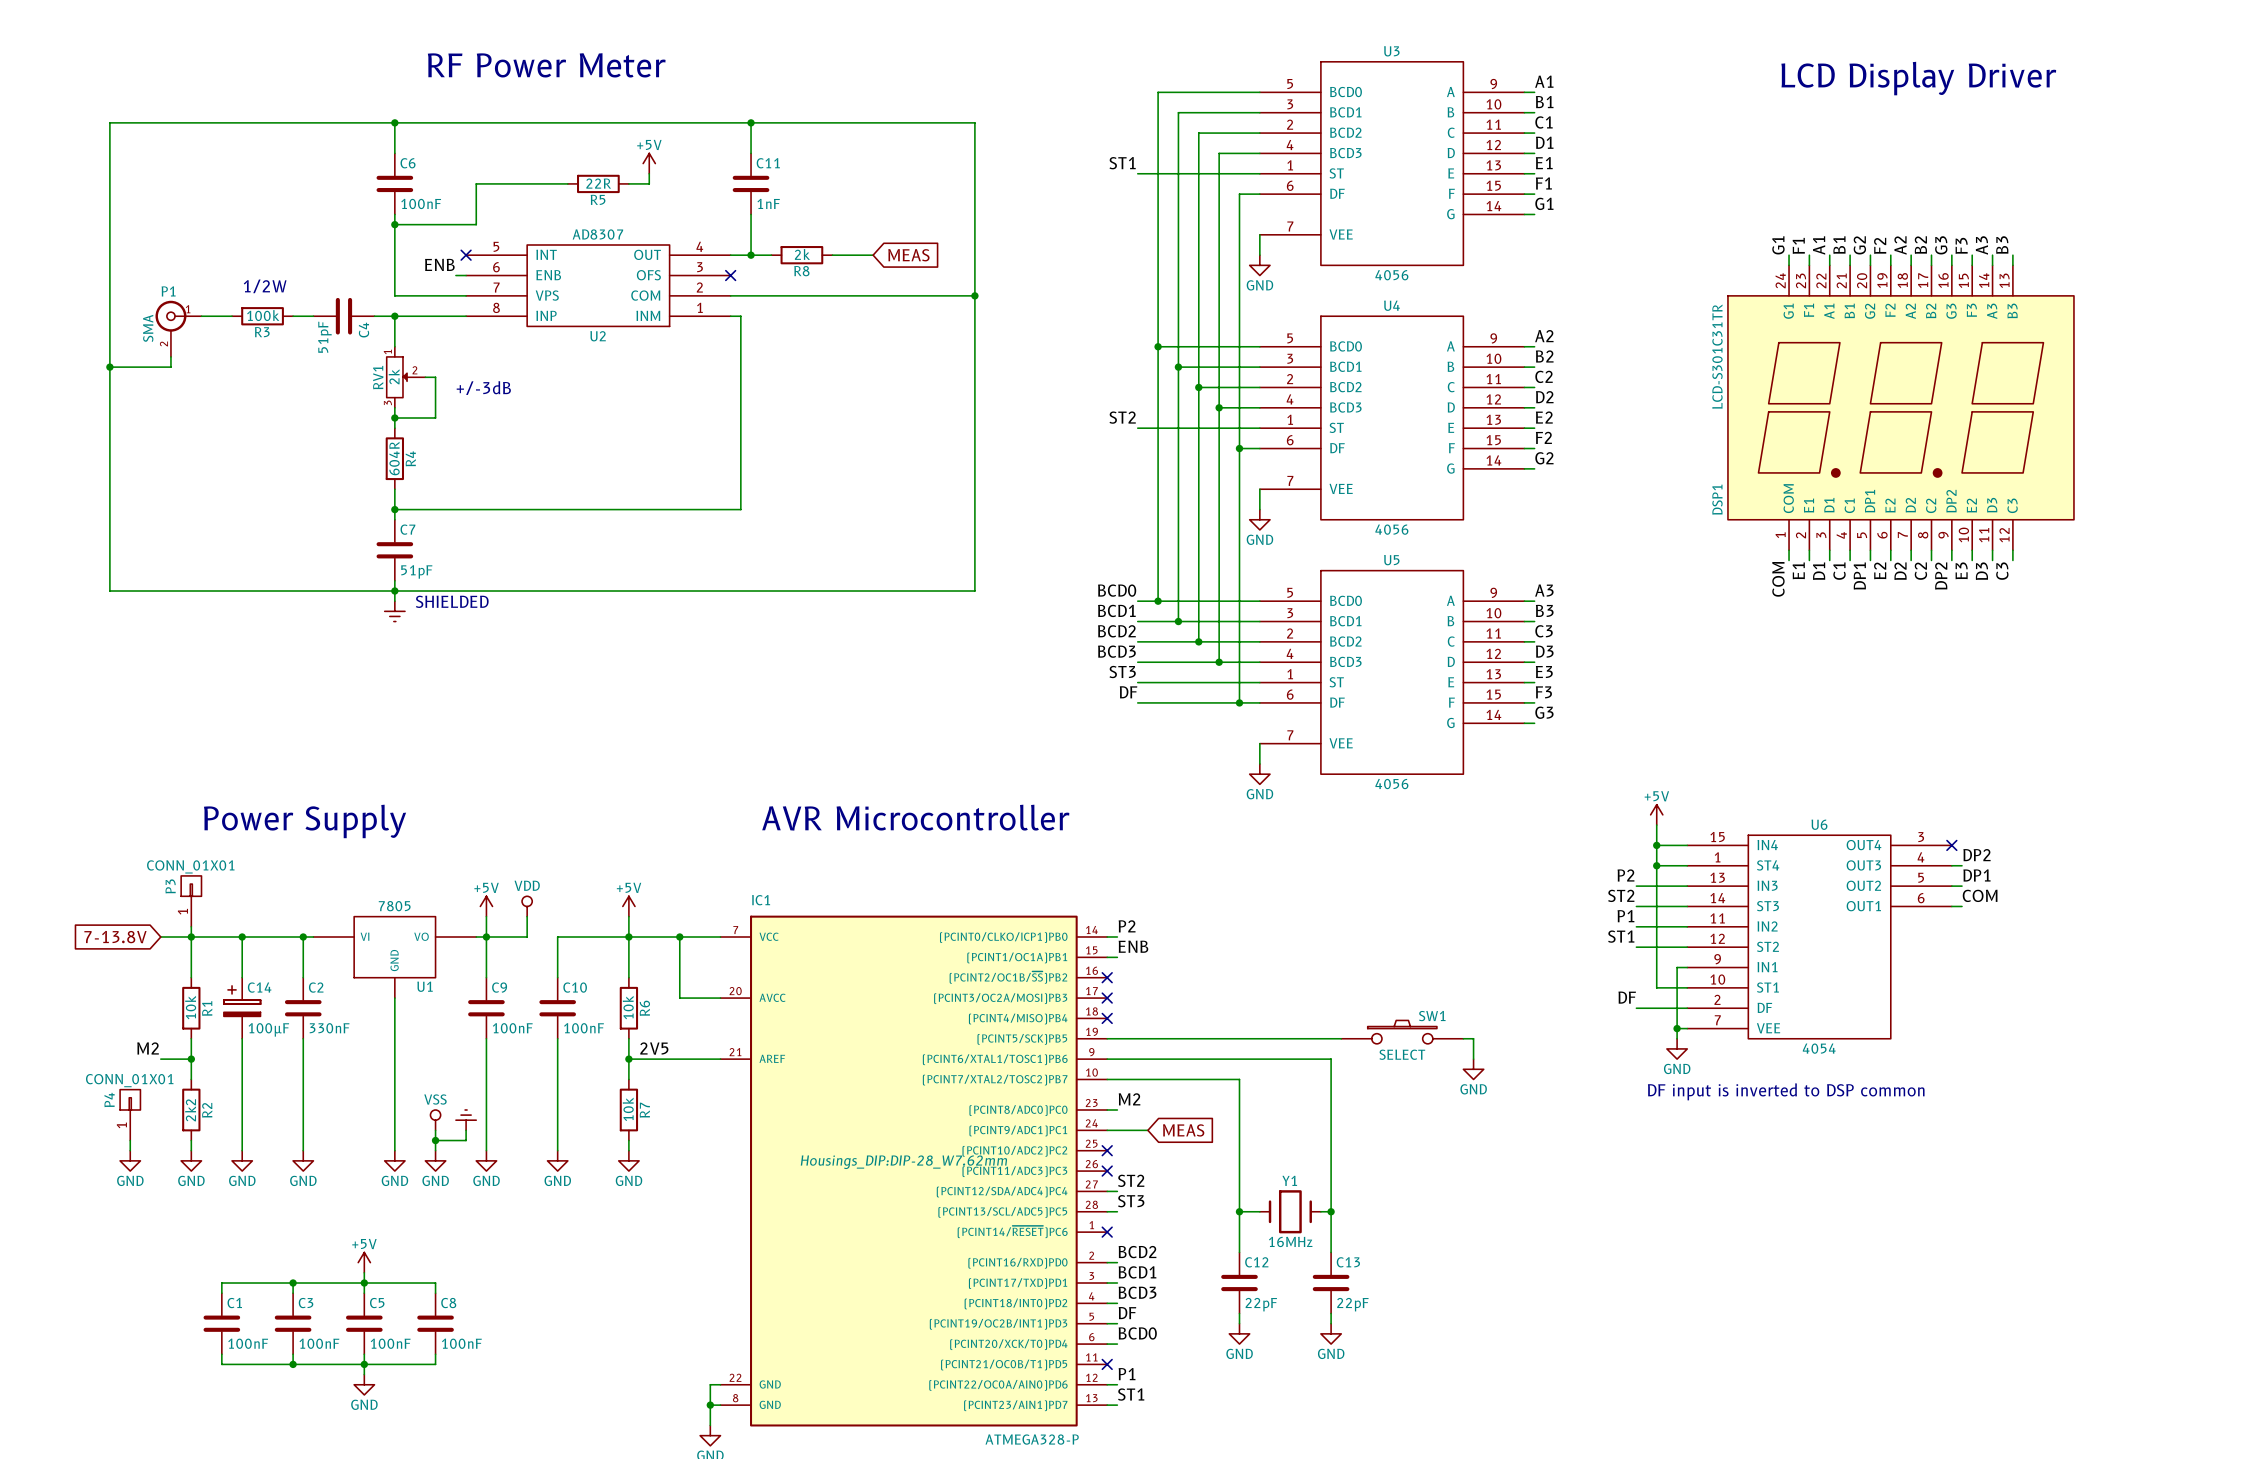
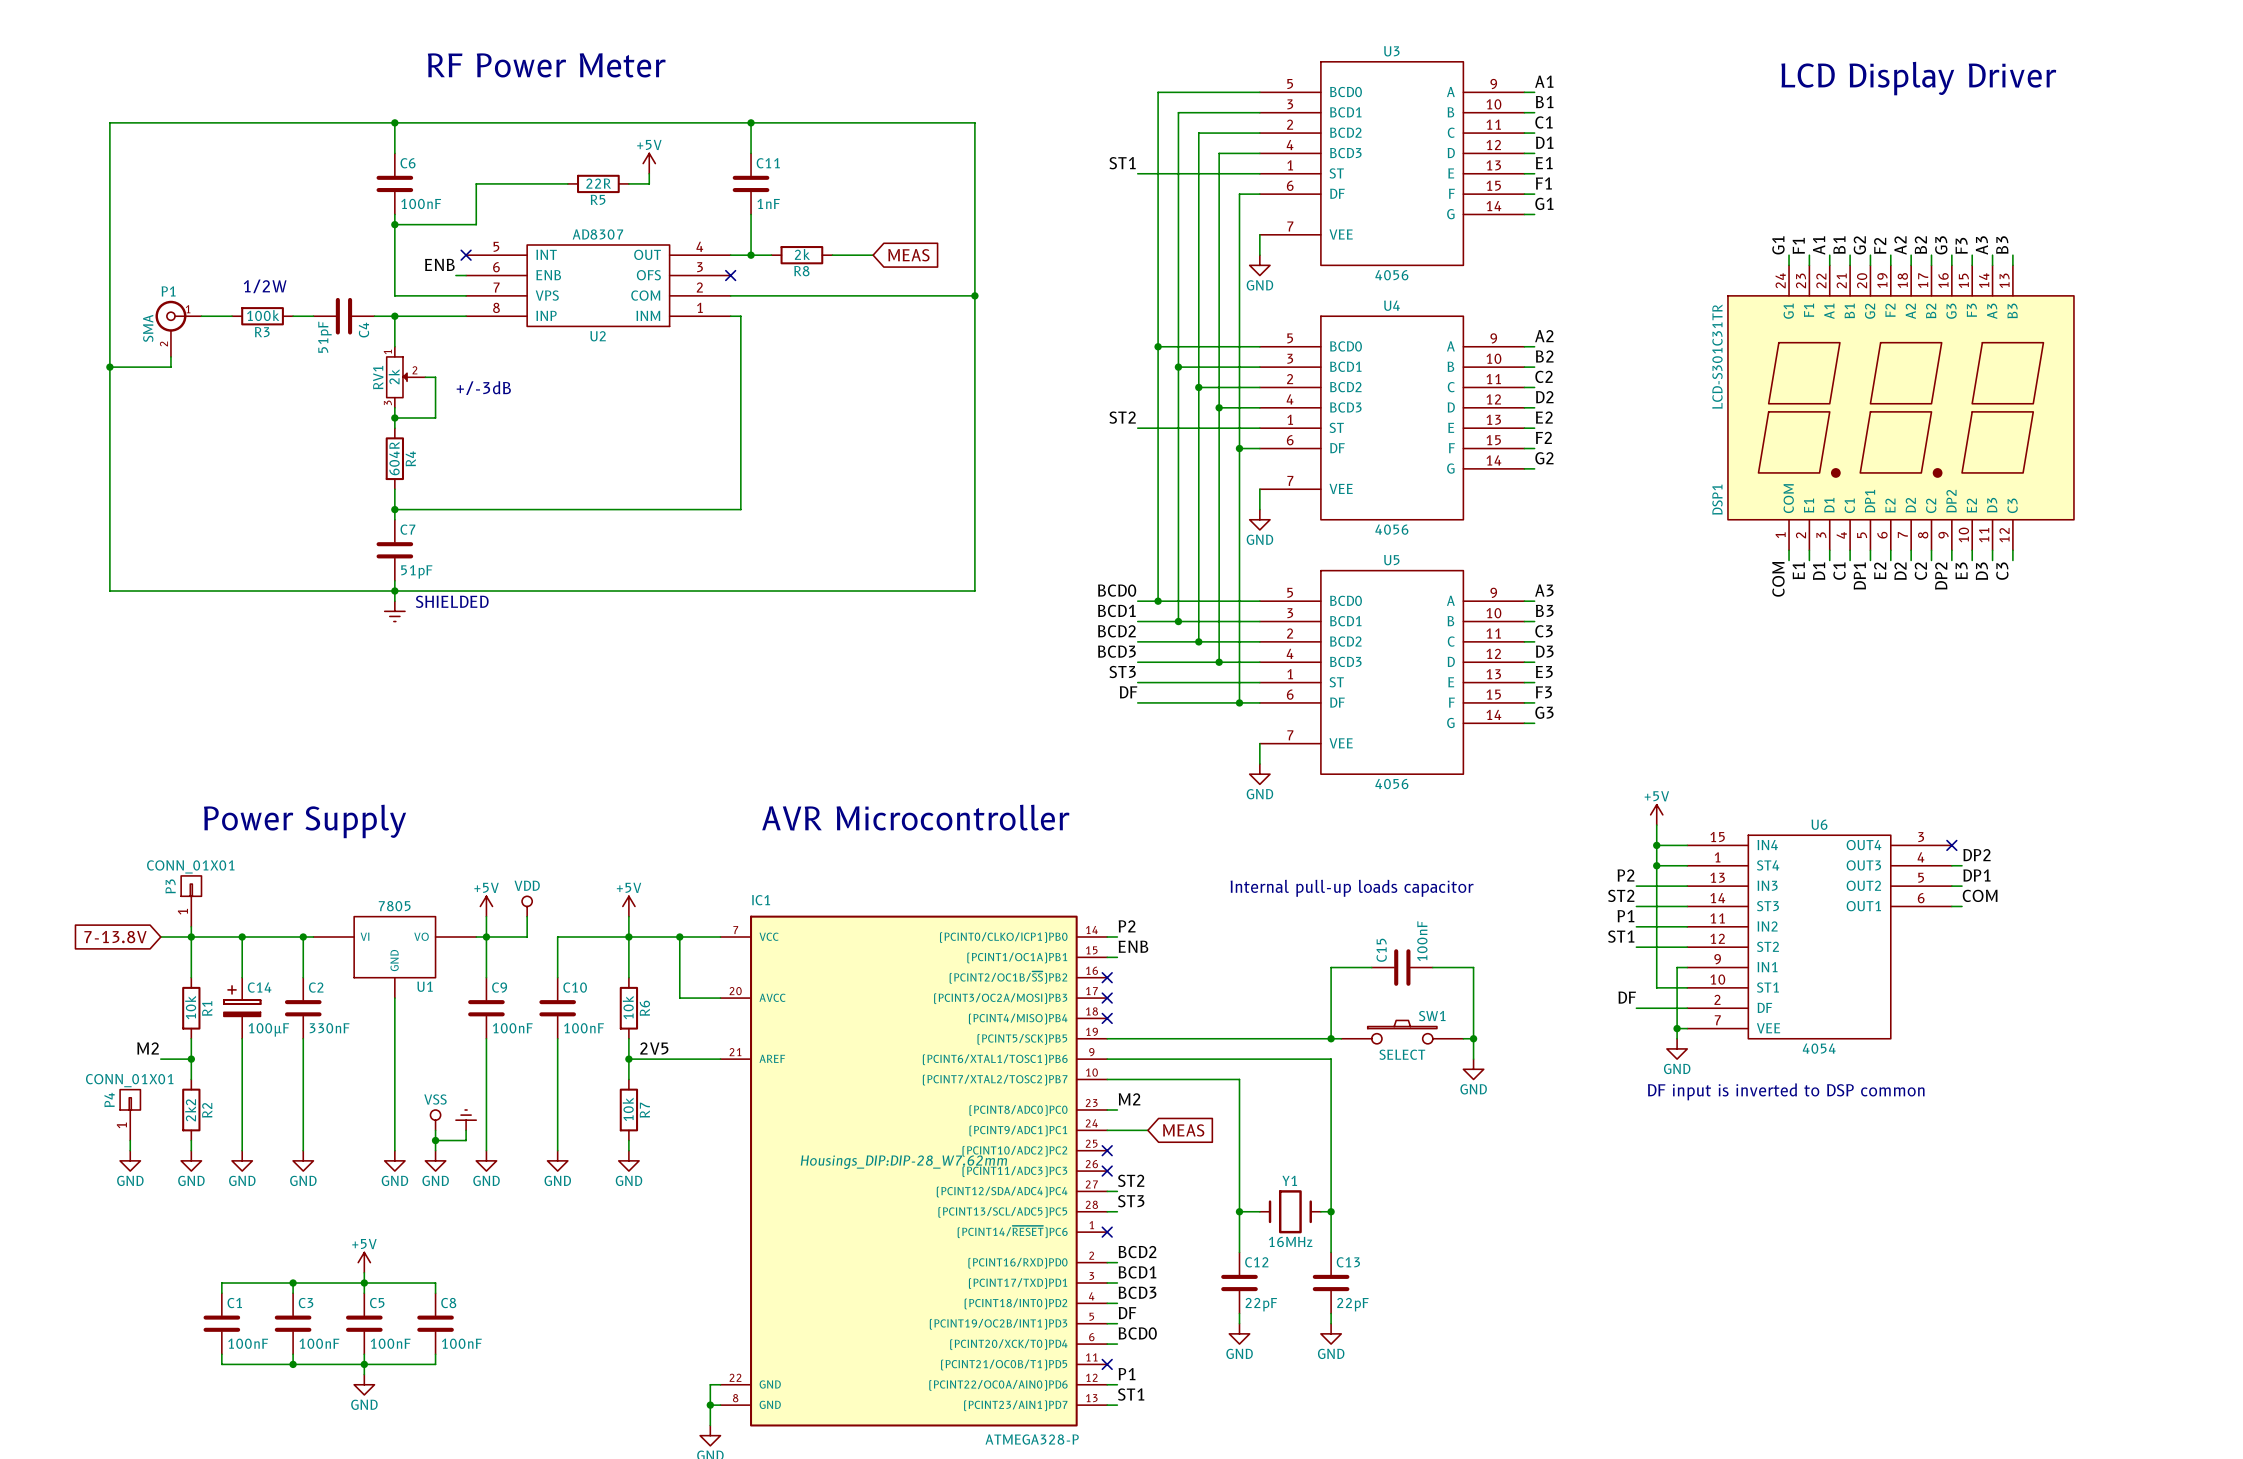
text: none -> Internal pull-up loads capacitor (1352, 888)
wire: none -> (1371, 967) (1331, 967) (1331, 1038)
C15: none -> 100nF (1402, 967)
wire: none -> (1432, 967) (1473, 967) (1473, 1038)
junction: none -> (1331, 1038)
junction: none -> (1473, 1038)

